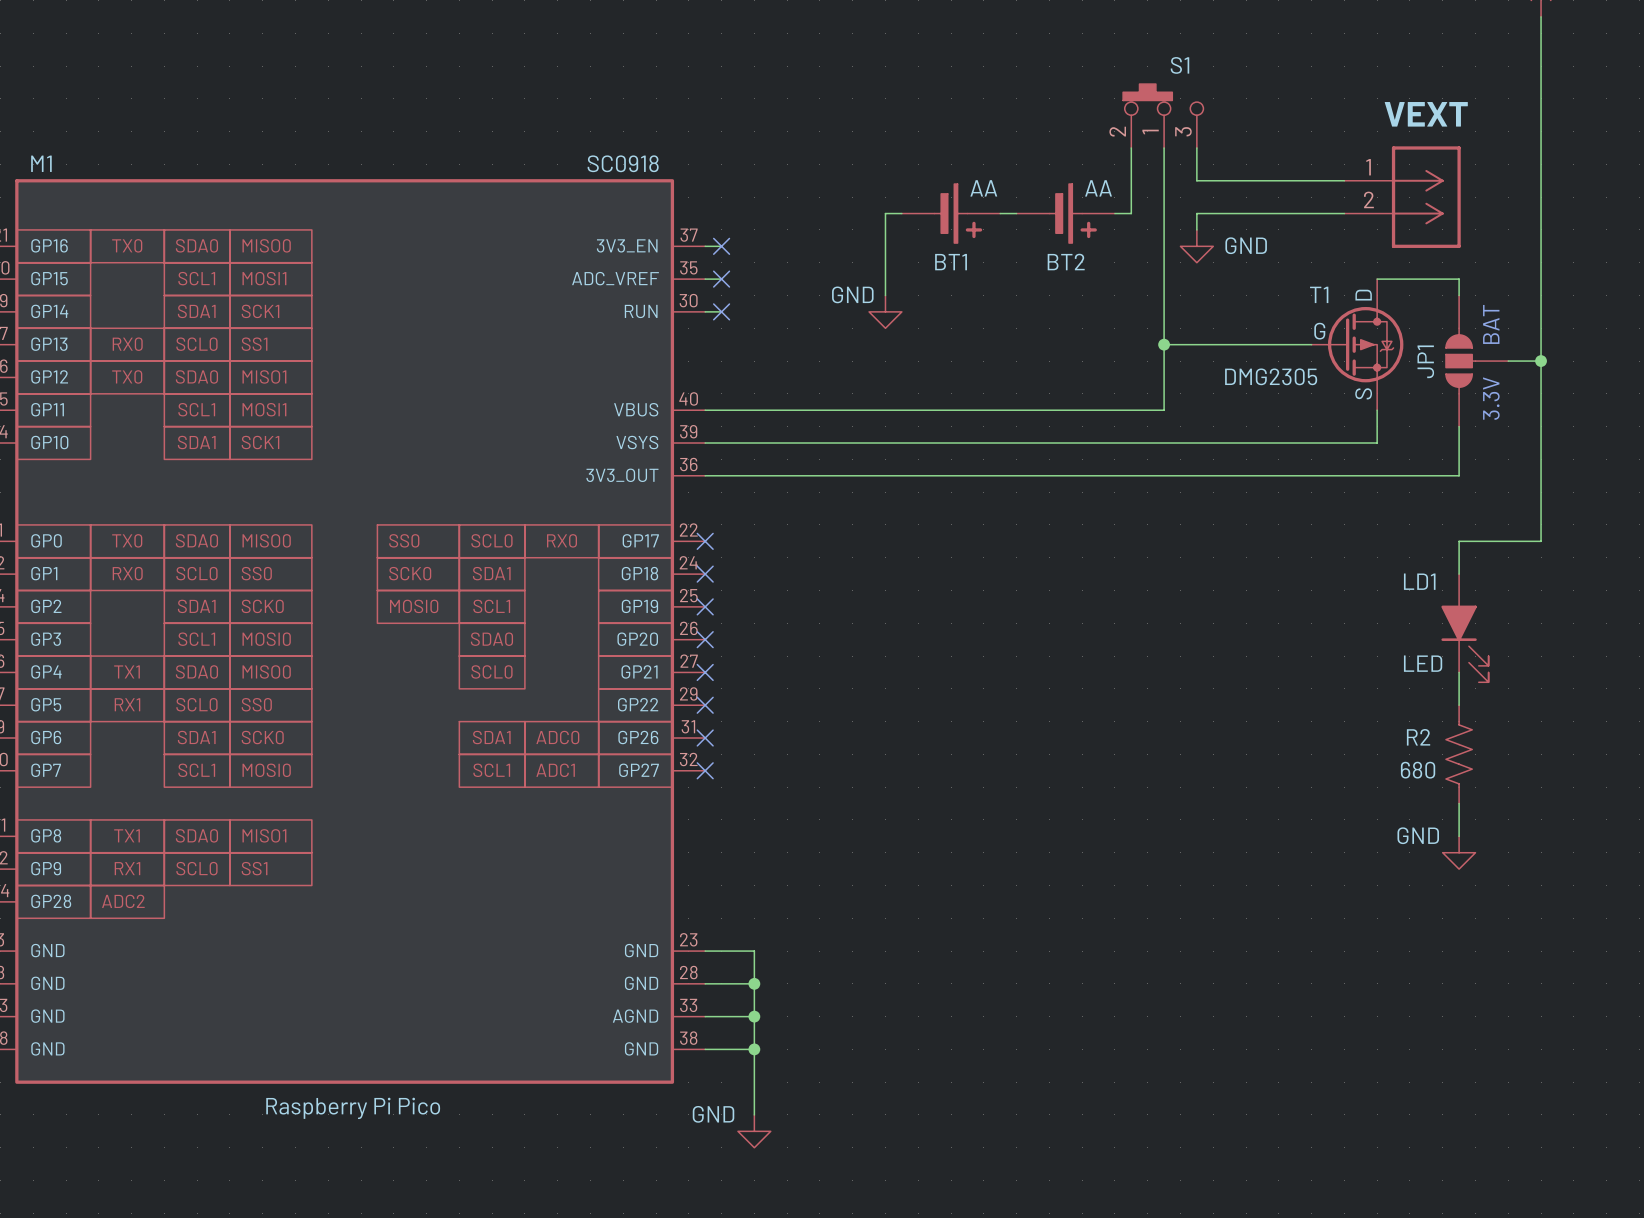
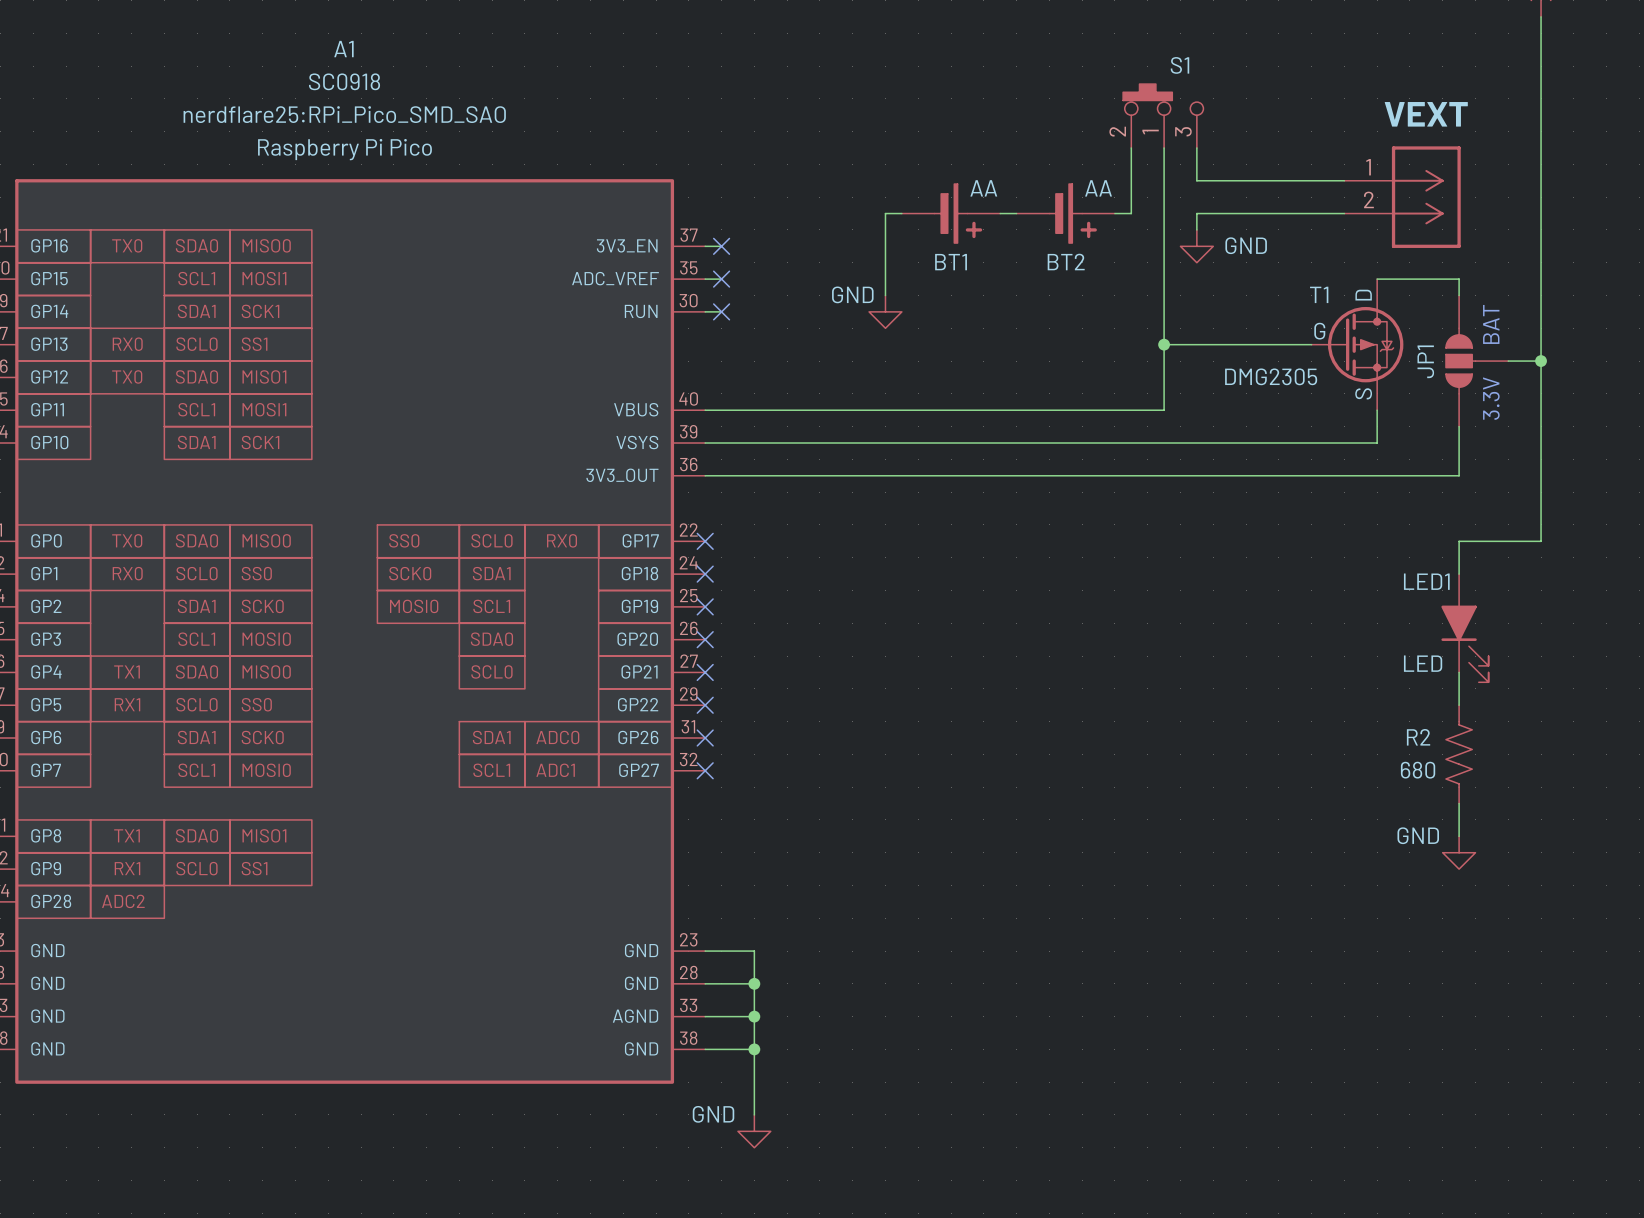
M1 text: none -> nerdflare25:RPi_Pico_SMD_SAO (344, 114)
M1 name: M1 (41, 163) -> A1 (343, 49)
M1 value position: SC0918 (623, 163) -> SC0918 (344, 81)
LD1 name: LD1 (1419, 581) -> LED1 (1426, 581)
M1 text position: Raspberry Pi Pico (353, 1108) -> Raspberry Pi Pico (344, 149)

